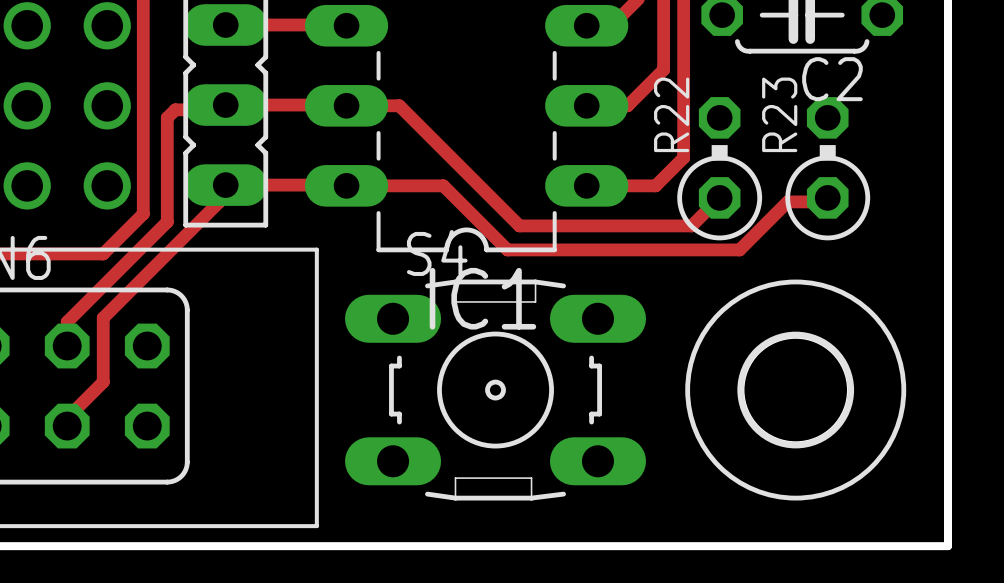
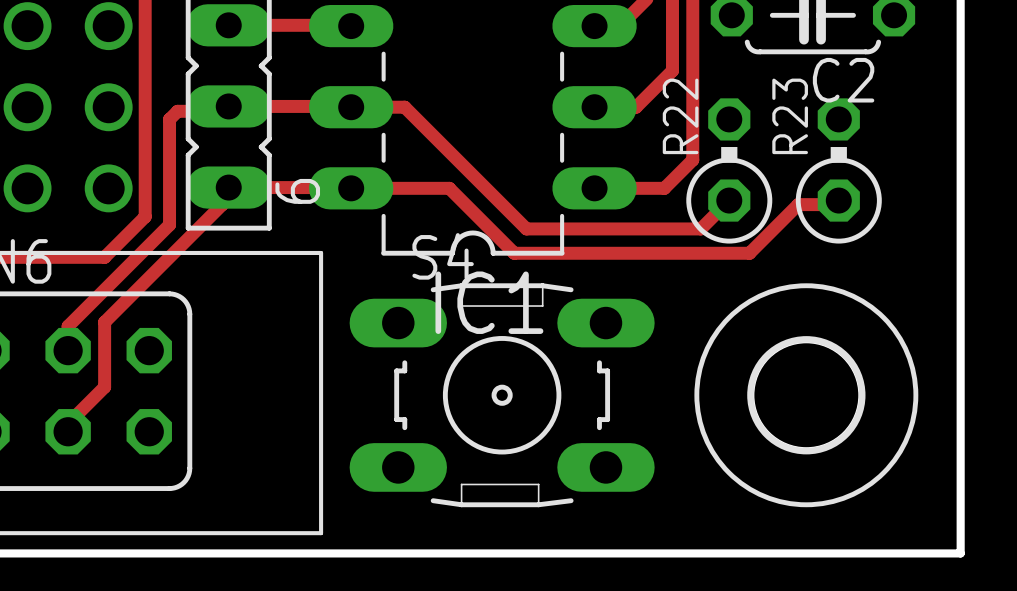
part text: none -> 6 (297, 191)

